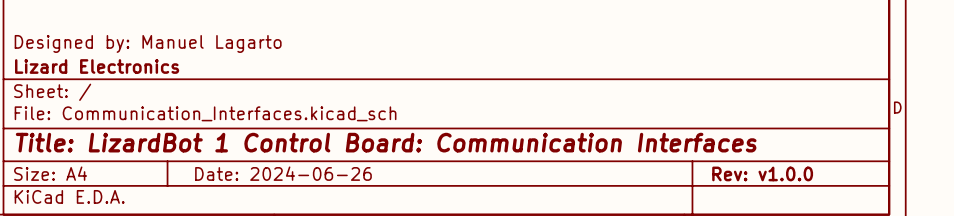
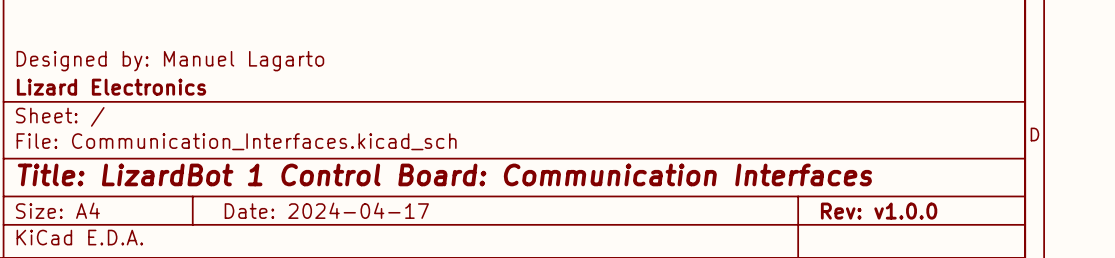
title block: Date: 2024-06-26 (283, 173) -> Date: 2024-04-17 (326, 210)

